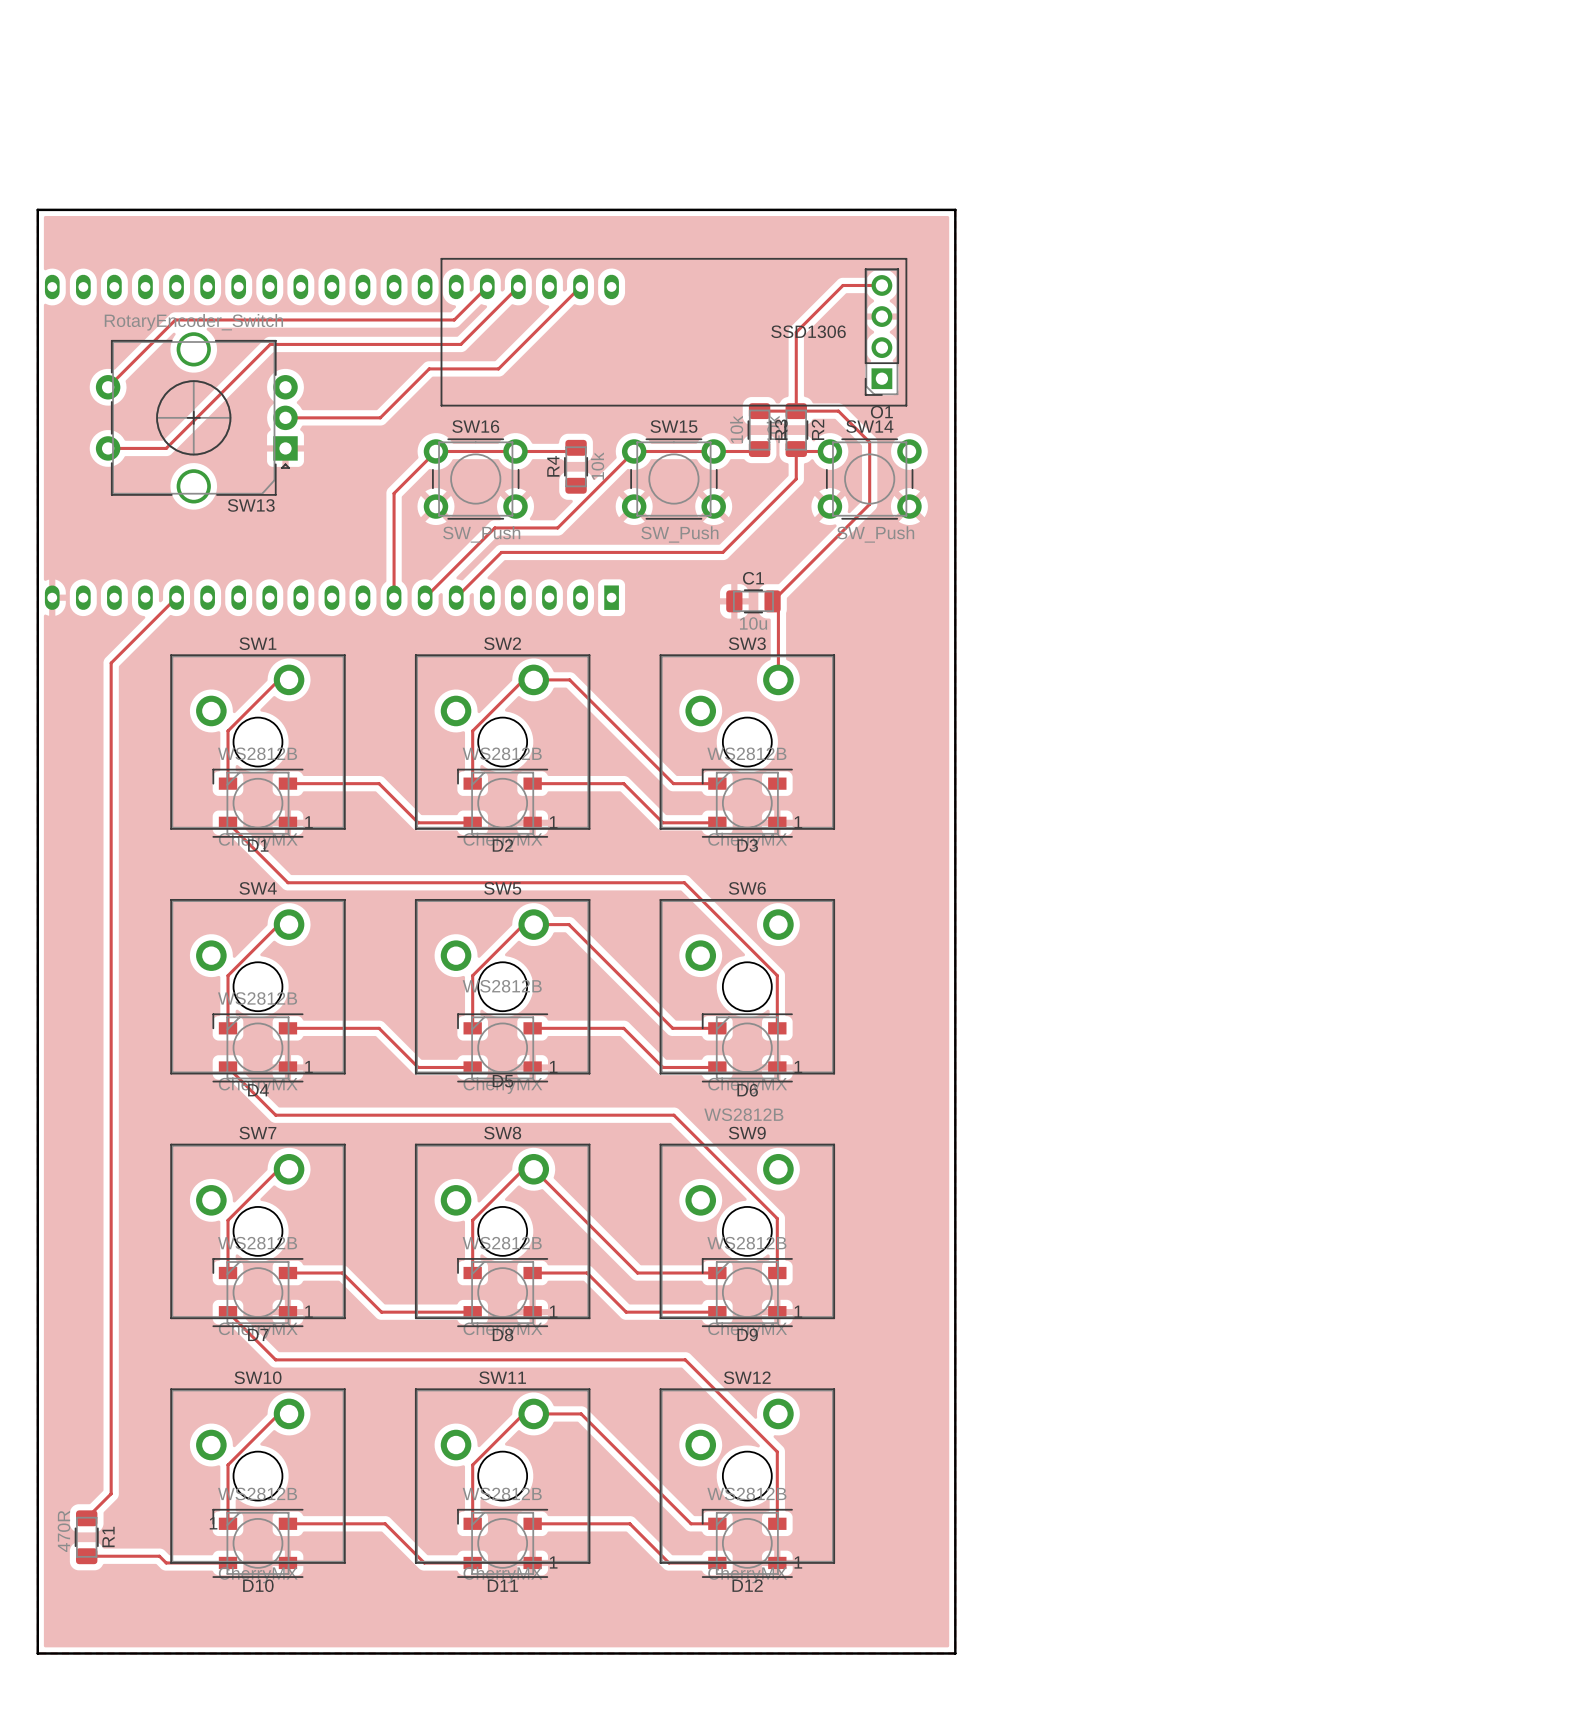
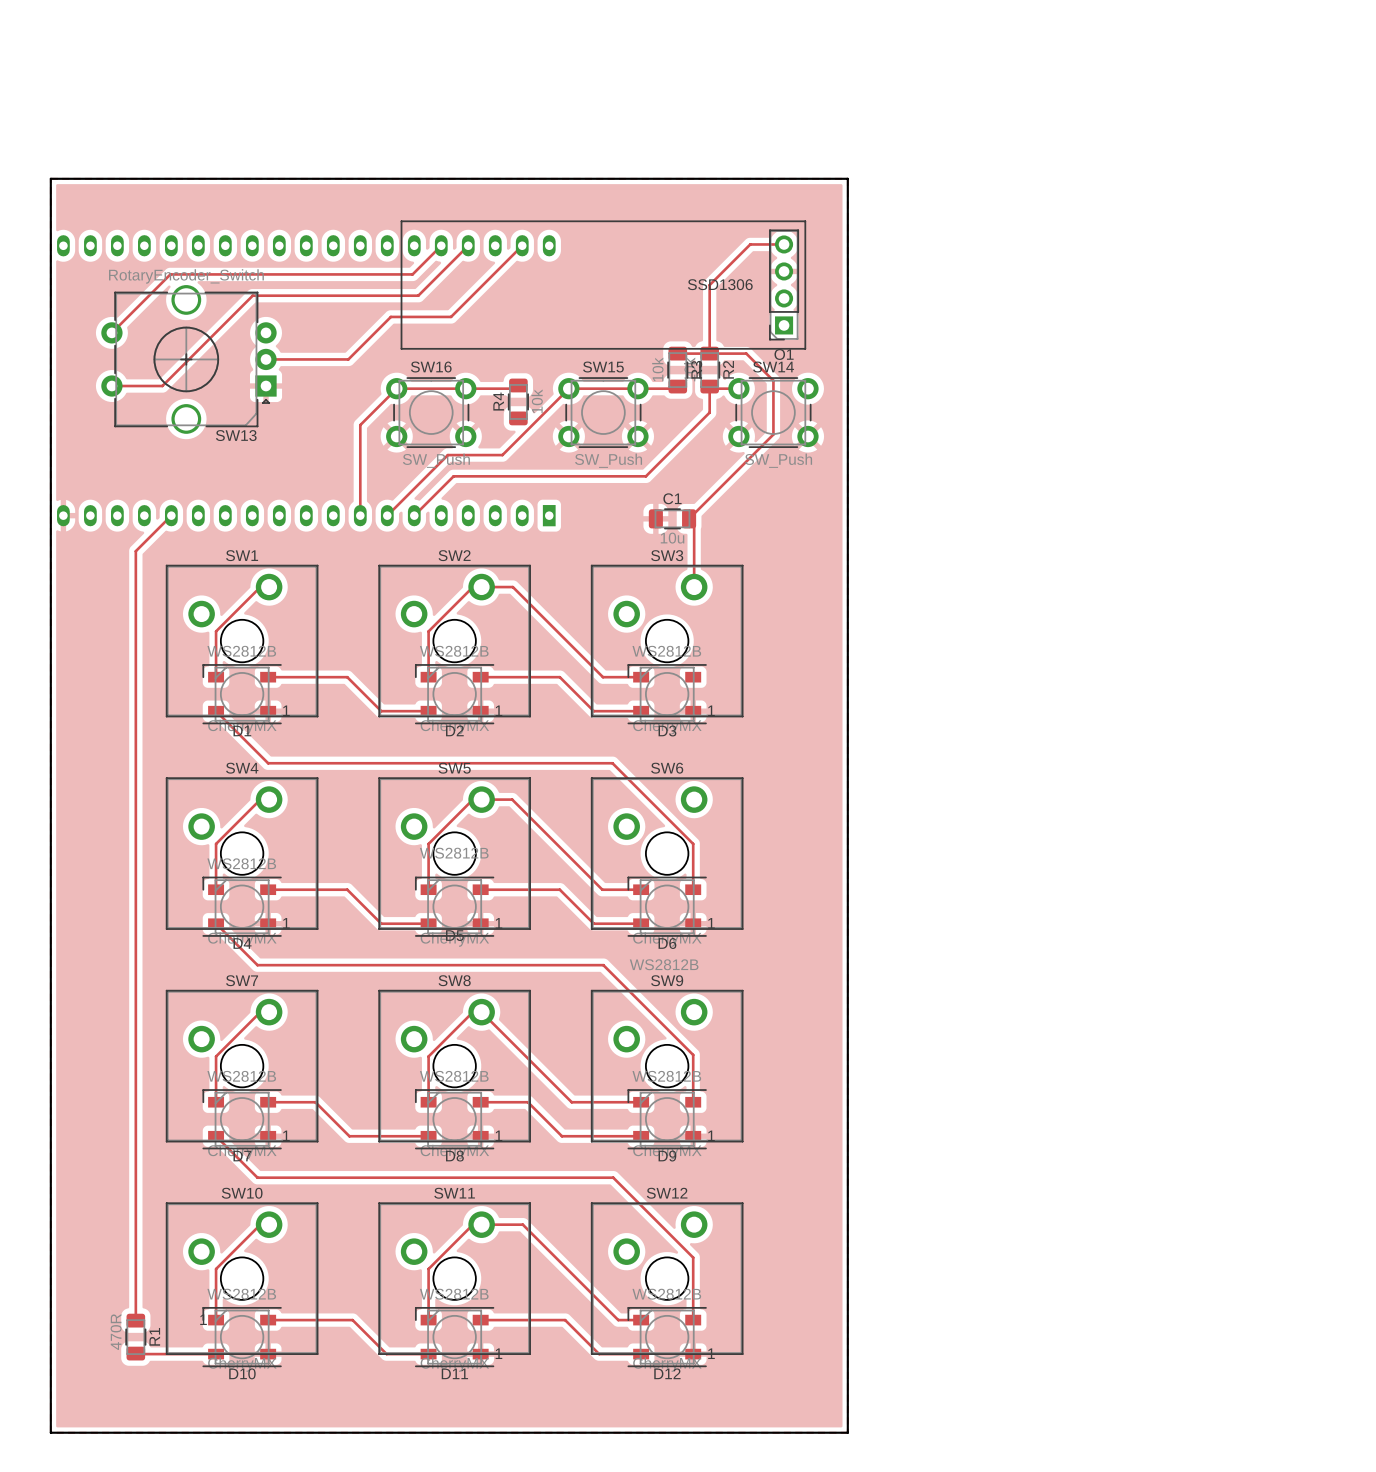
track: (135, 638) (111, 663) (111, 1493) (86, 1518) -> (135, 551) (135, 1320)
R1 position: (86, 1537) -> (135, 1337)
track: (86, 1556) (159, 1556) (166, 1562) -> (135, 1353) (162, 1354)

